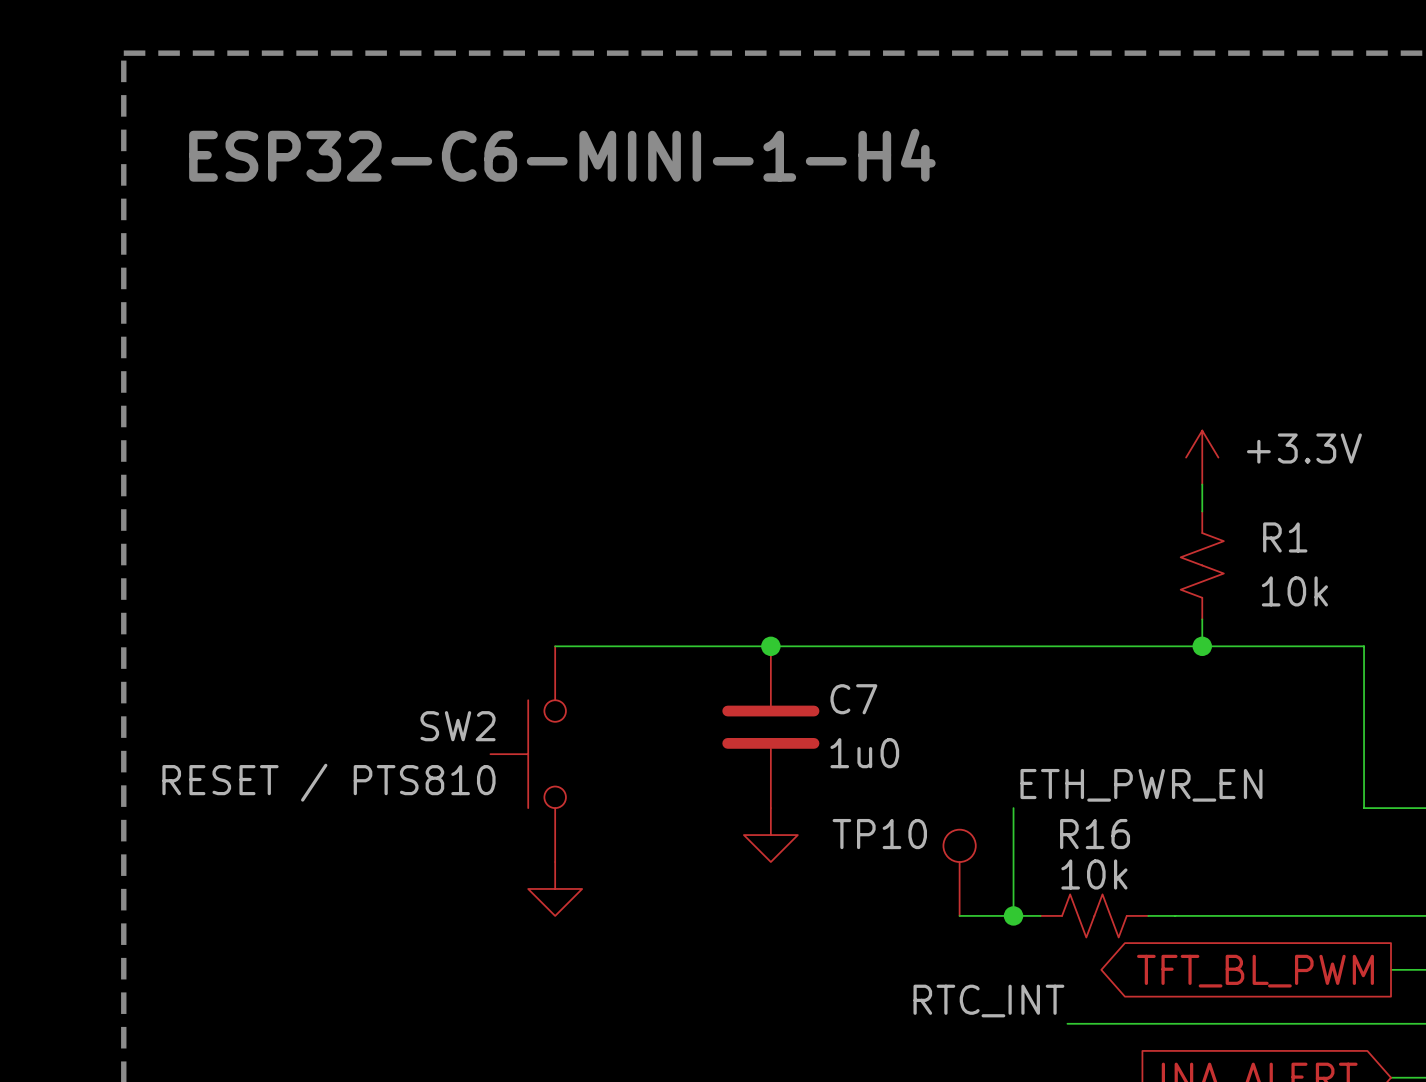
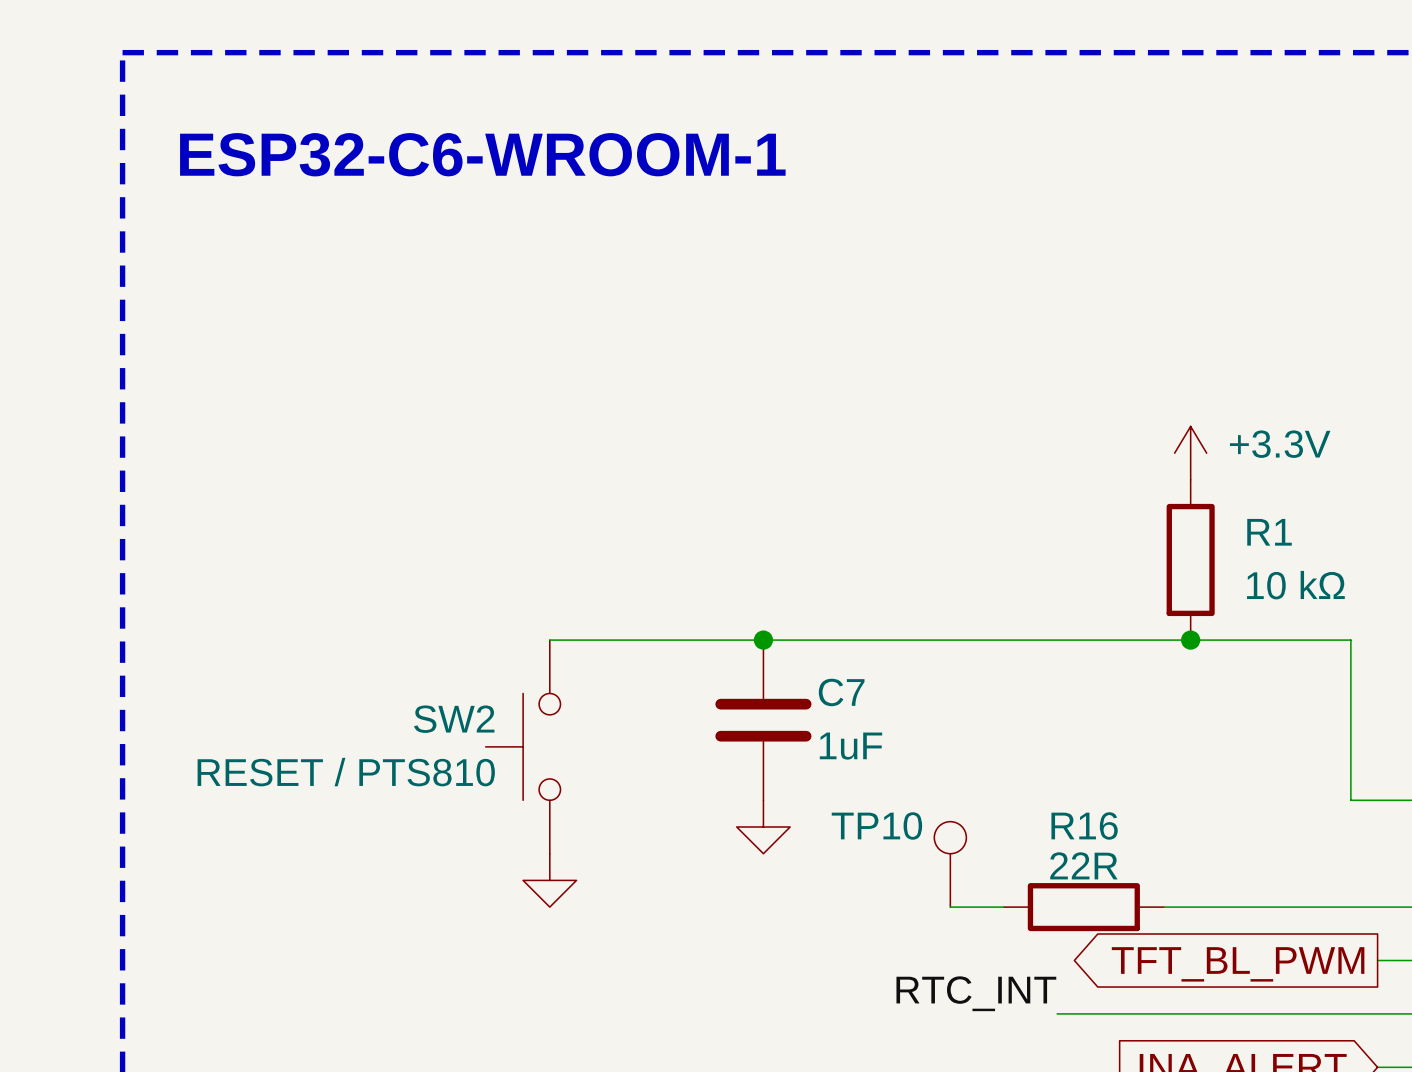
text: ESP32-C6-MINI-1-H4 (562, 155) -> ESP32-C6-WROOM-1 (482, 154)
R1 symbol: [1180, 511, 1224, 620] -> [1166, 479, 1215, 641]
R1 value: 10k (1294, 591) -> 10 kΩ (1295, 585)
C7 value: 1u0 (864, 753) -> 1uF (850, 746)
label: ETH_PWR_EN (1141, 785) -> none
wire: (1013, 808) (1013, 915) (1040, 915) -> none
R16 value: 10k (1094, 874) -> 22R (1083, 865)
R16 symbol: [1040, 894, 1149, 938] -> [1003, 883, 1164, 932]
junction: (1013, 915) -> none

